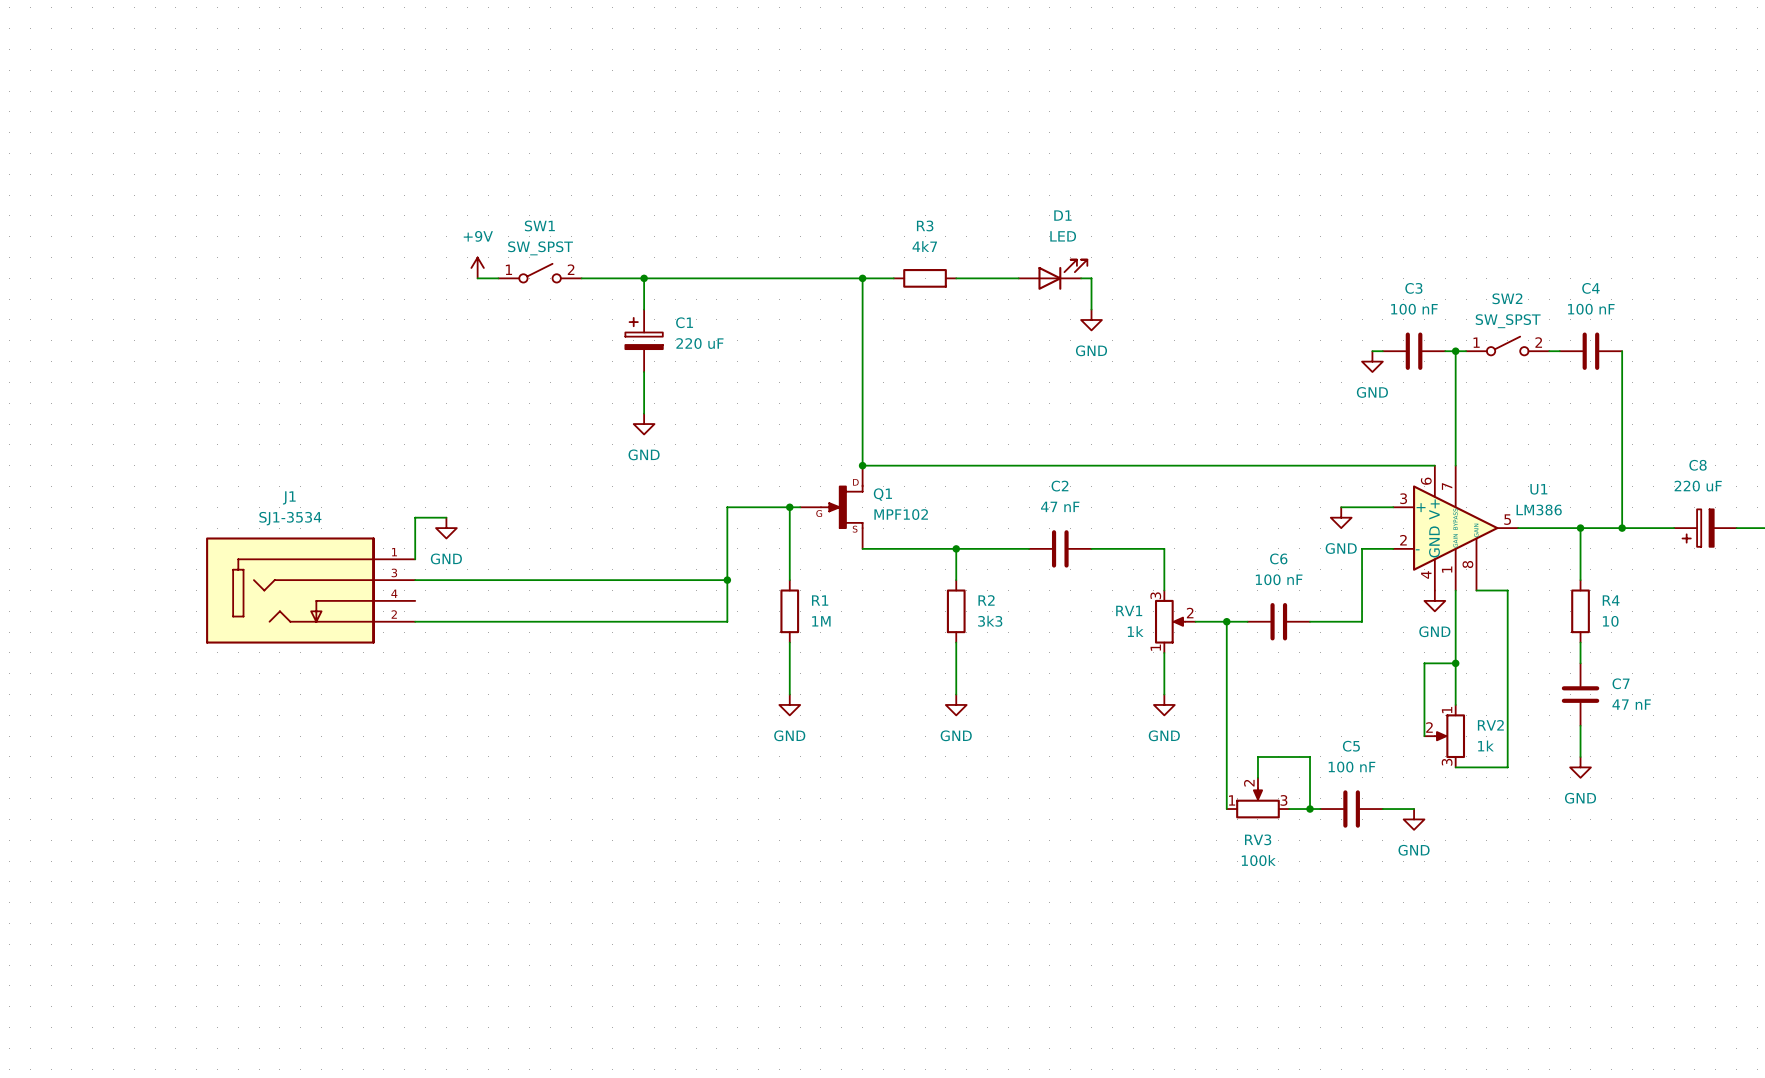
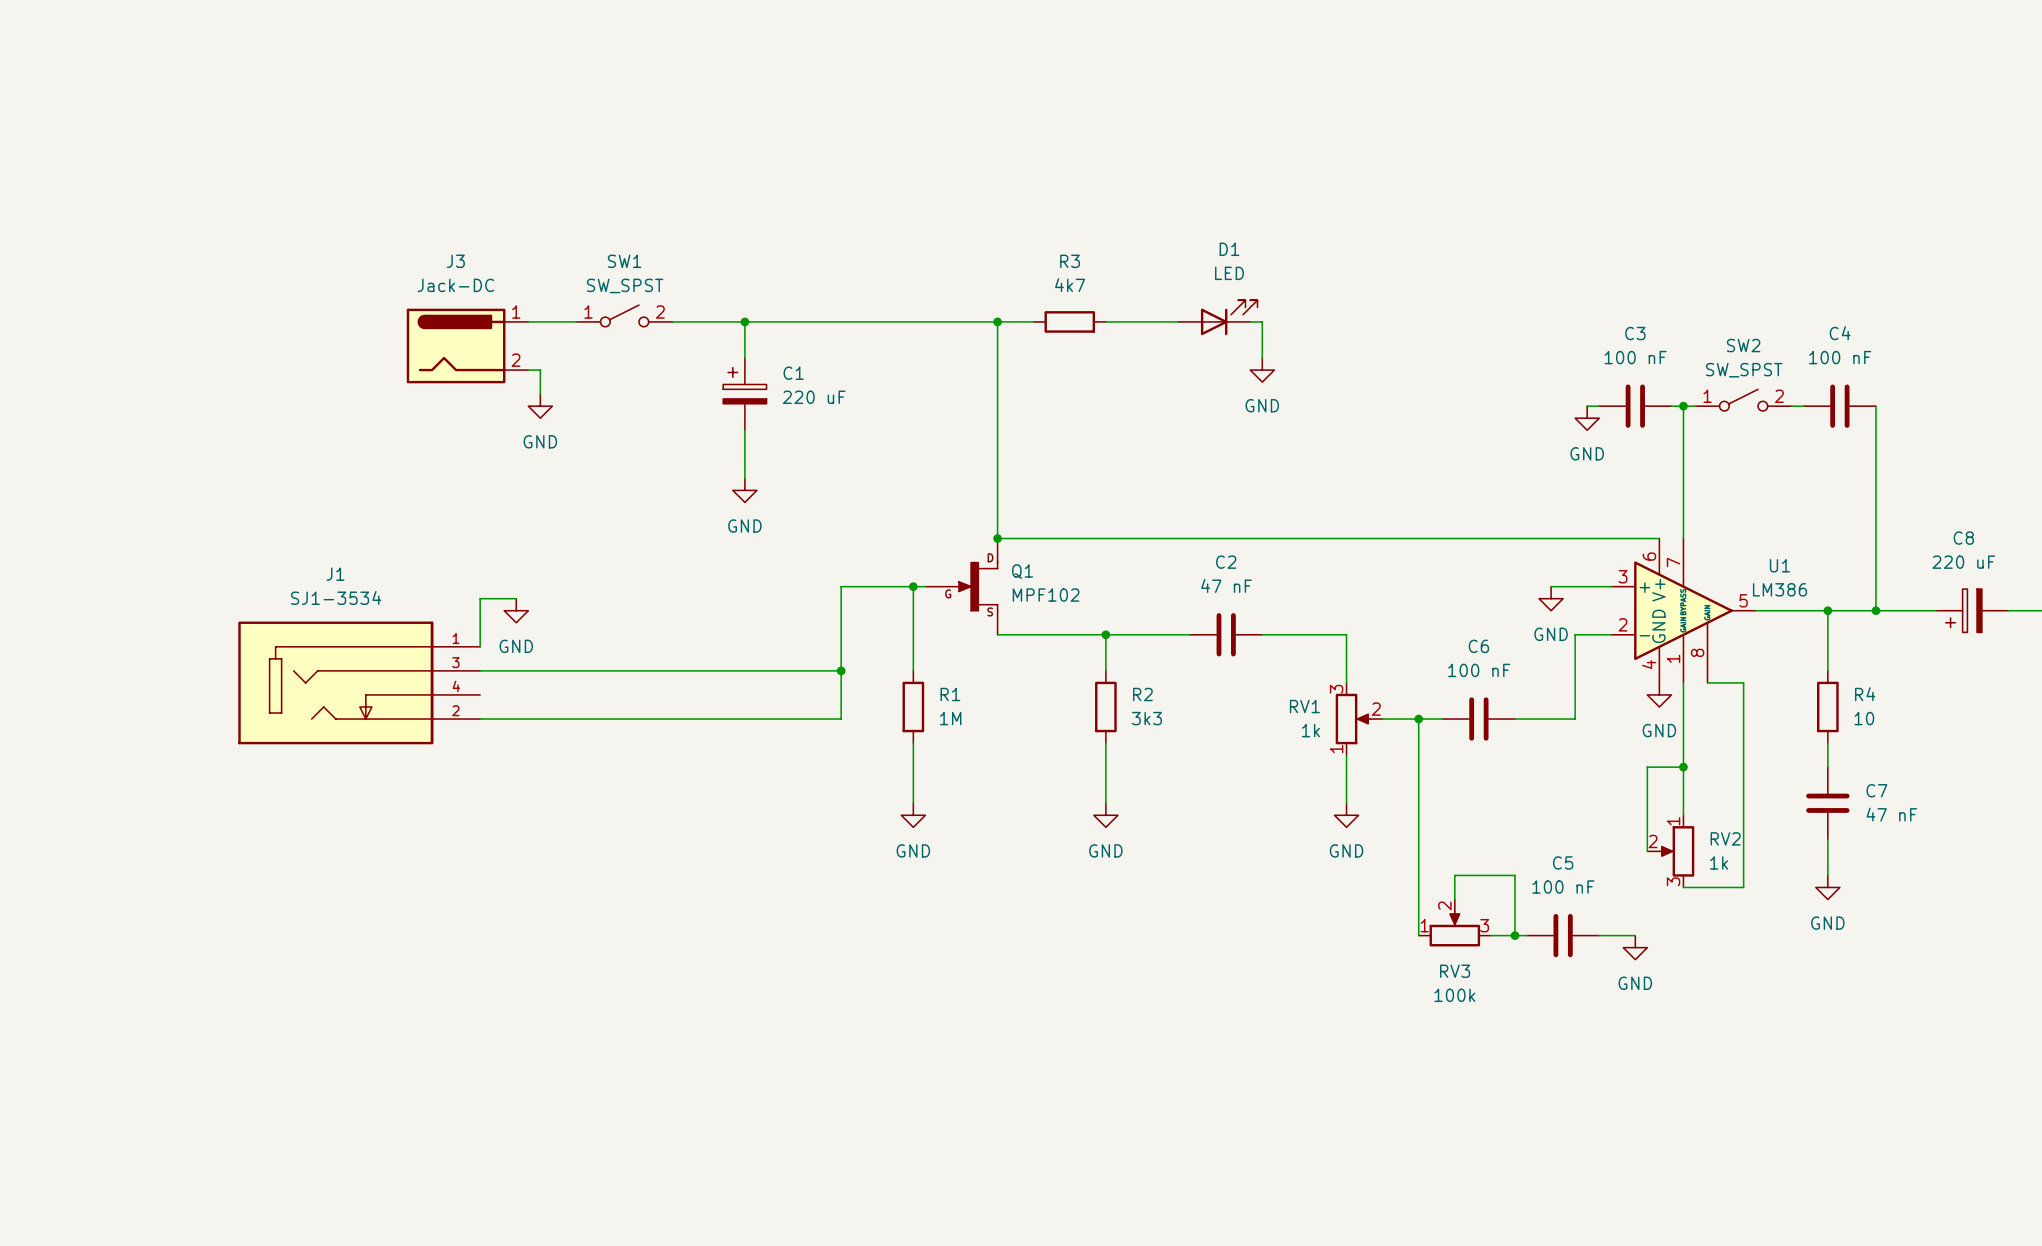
power symbol: +9V (477, 267) -> none
wire: none -> (528, 321) (552, 321)
J3: none -> Jack-DC (467, 346)
wire: none -> (528, 370) (540, 370) (540, 394)
power symbol: none -> GND (540, 406)

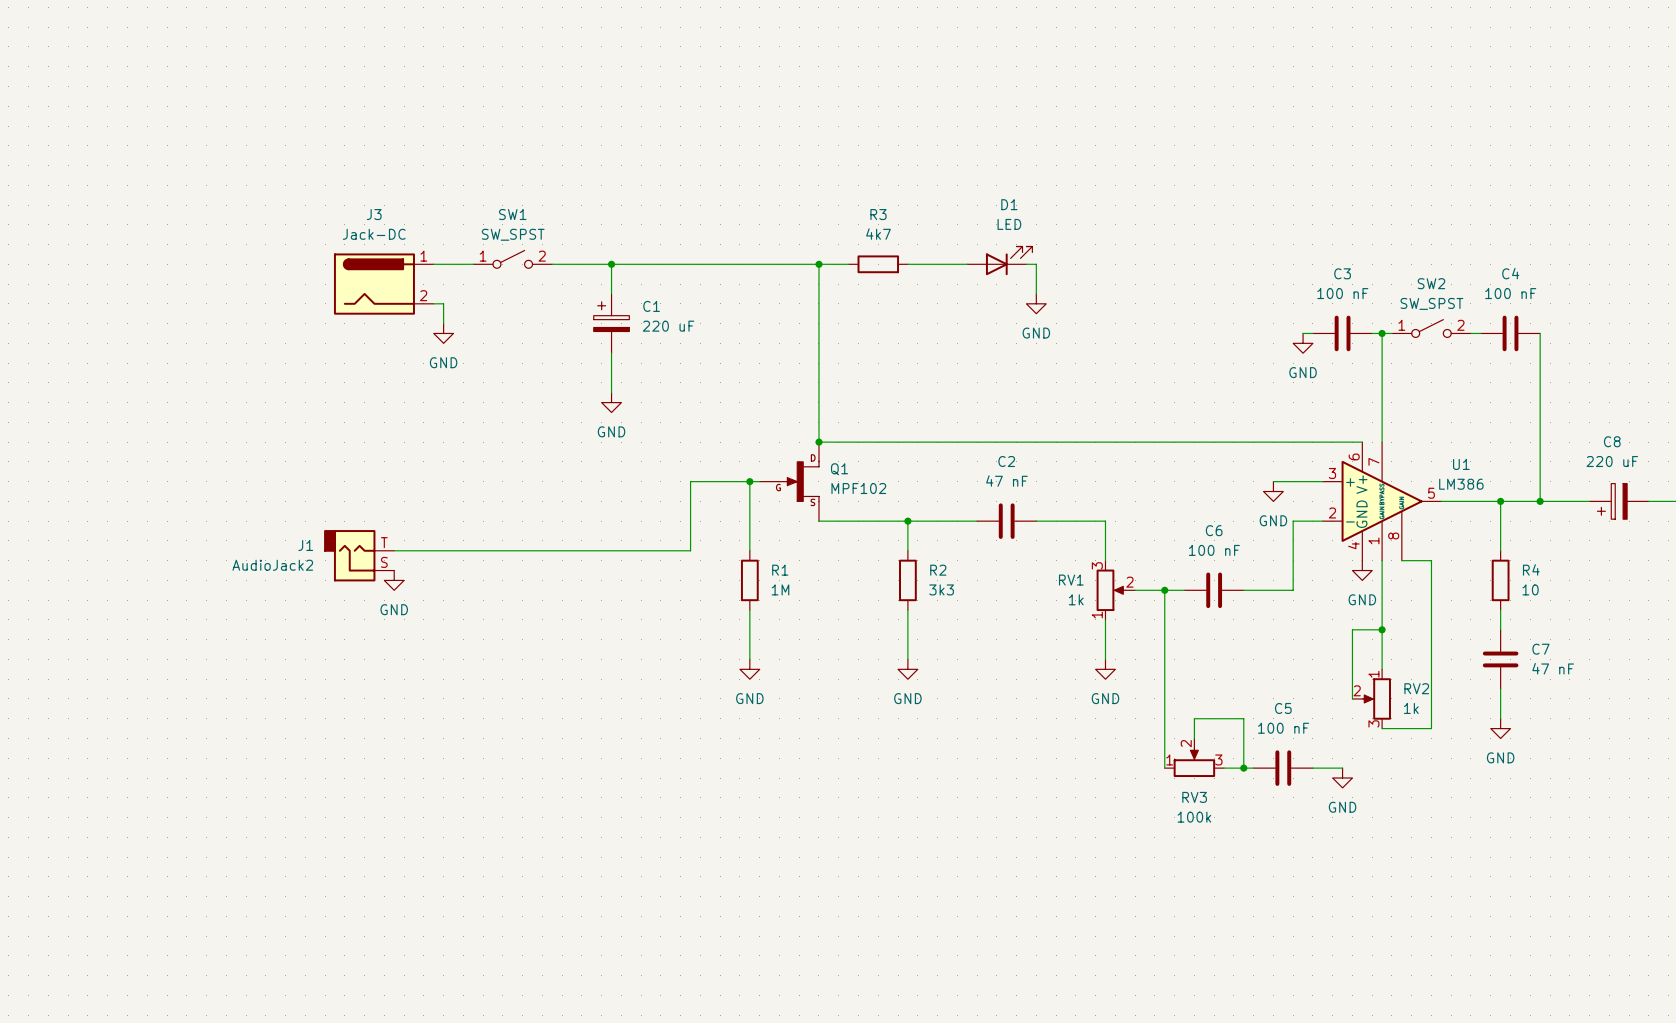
J1 name position: J1 (335, 574) -> J1 (305, 545)
J1 value: SJ1-3534 (336, 597) -> AudioJack2 (272, 565)
wire: (516, 598) (480, 598) (480, 646) -> none
power symbol position: GND (516, 610) -> GND (394, 580)
J1 symbol: [238, 621, 481, 745] -> [324, 530, 395, 582]
wire: (841, 670) (841, 719) (480, 719) -> none
junction: (841, 670) -> none

